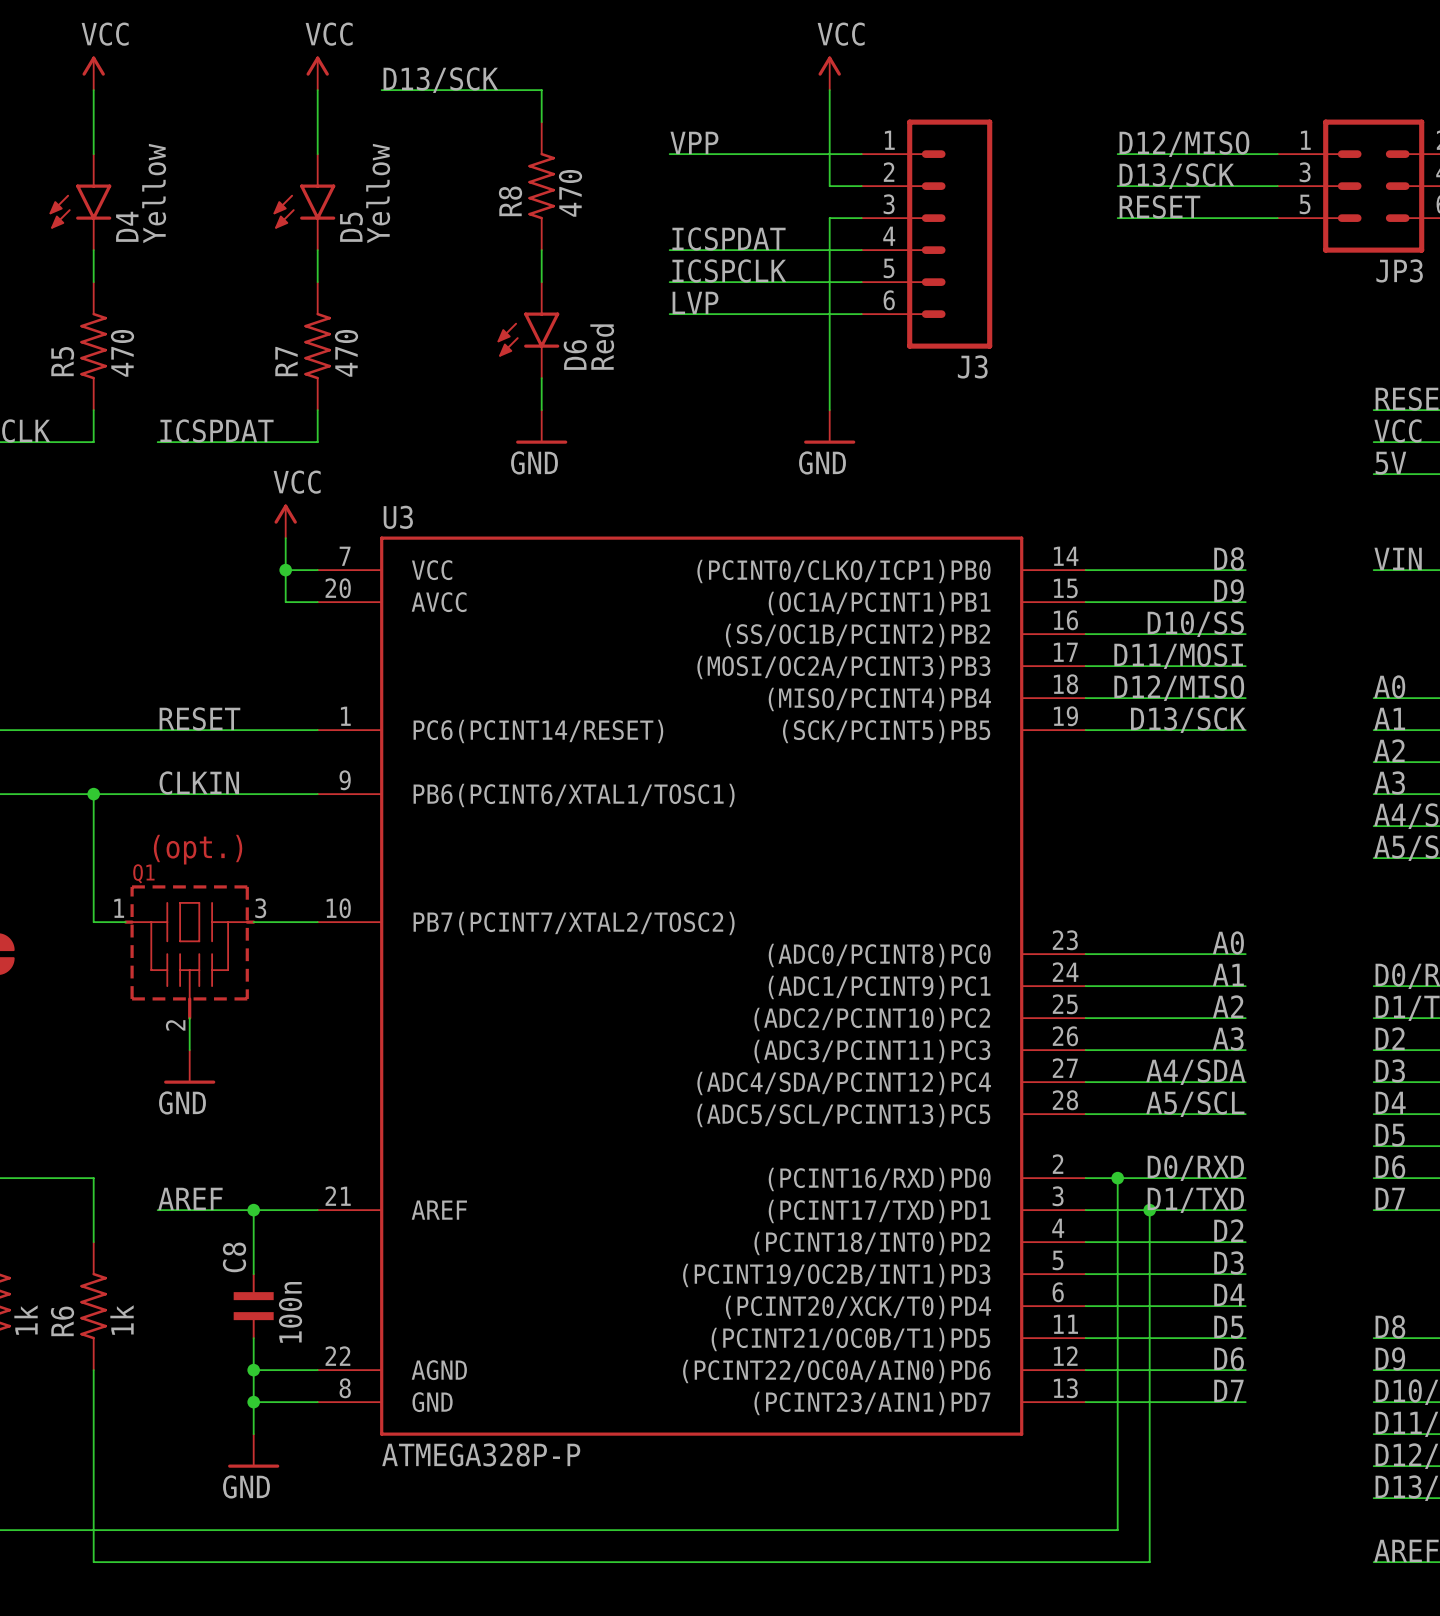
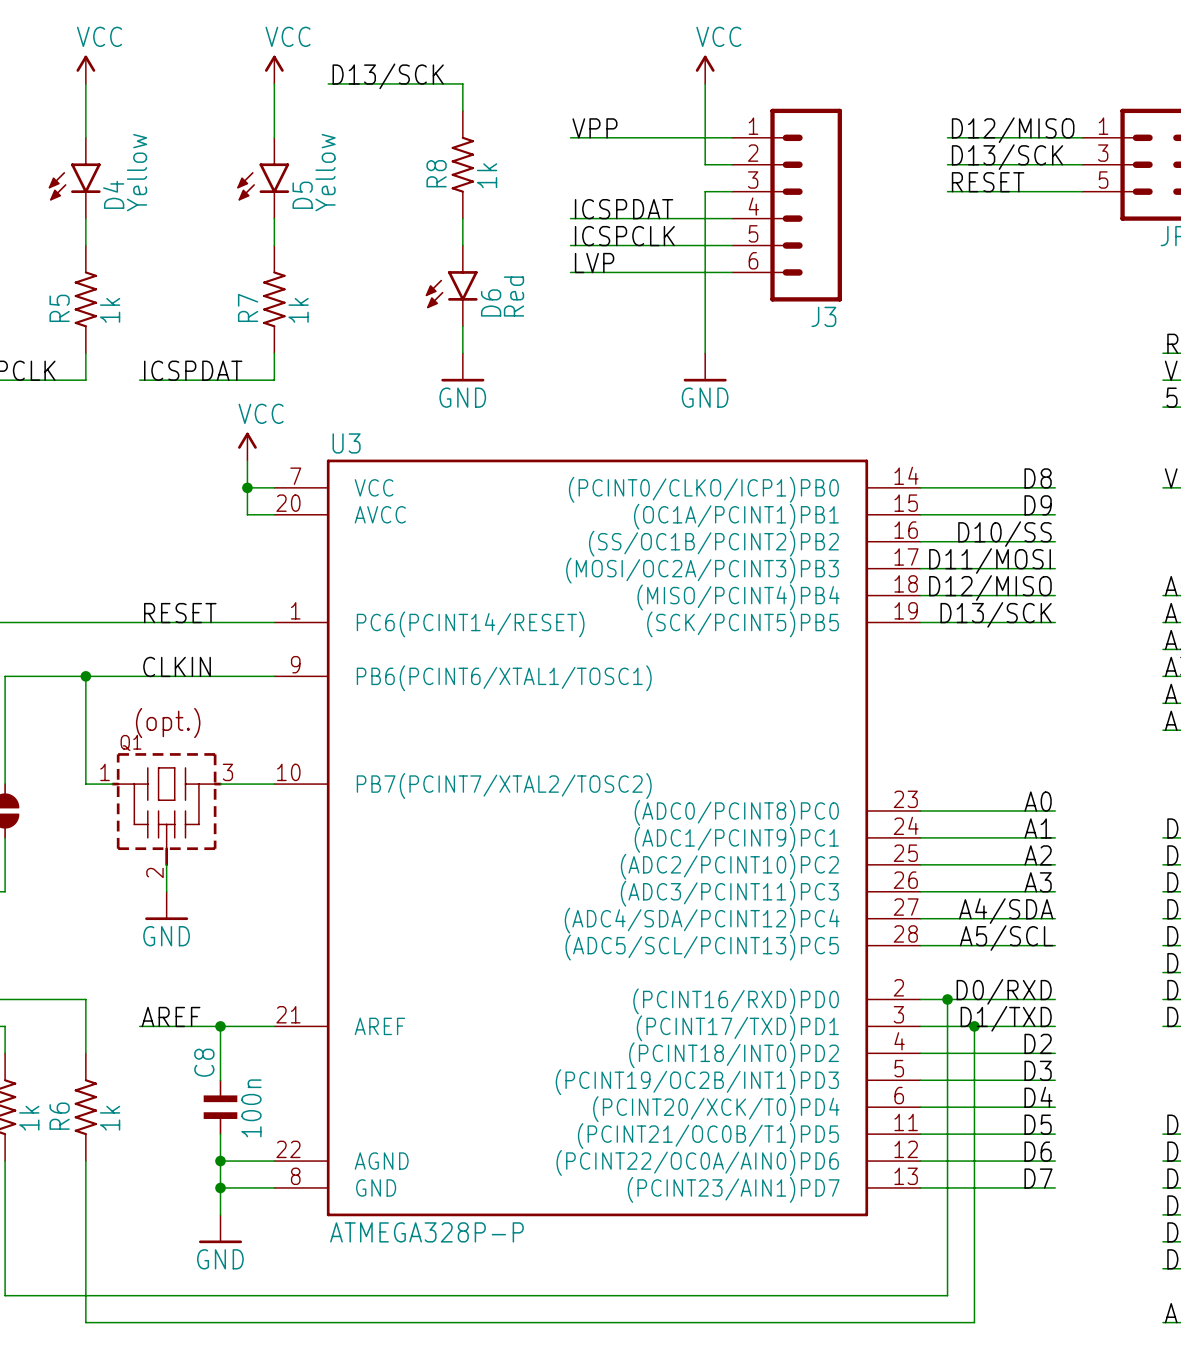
R8 value: 470 (570, 193) -> 1k (487, 175)
R5 value: 470 (122, 353) -> 1k (110, 310)
R7 value: 470 (346, 353) -> 1k (298, 310)

